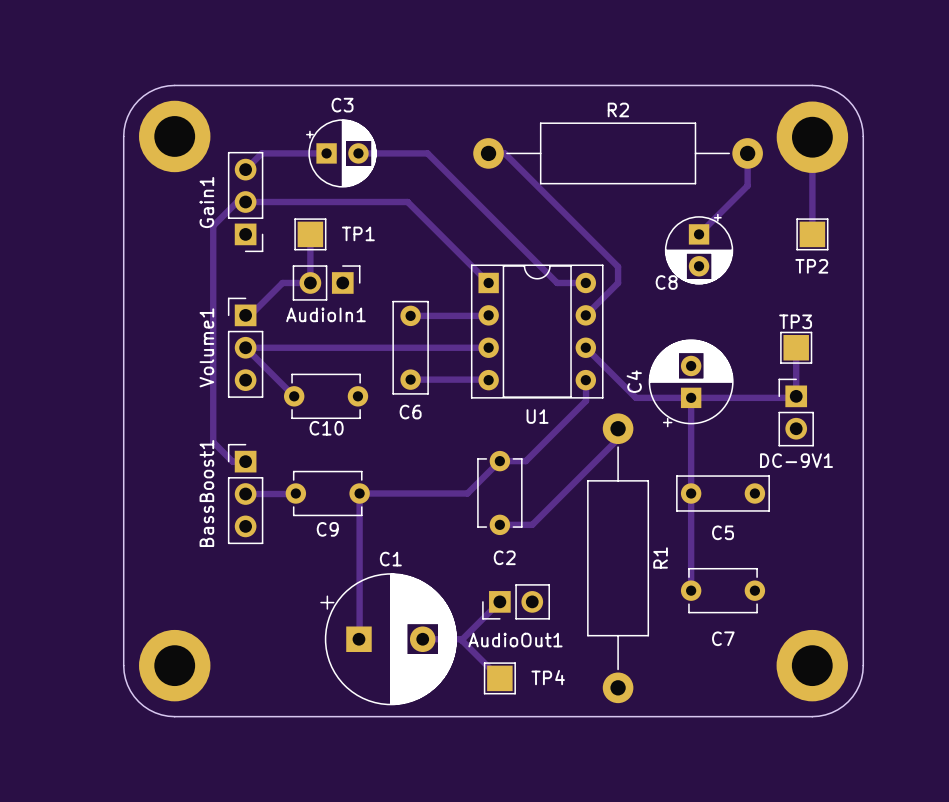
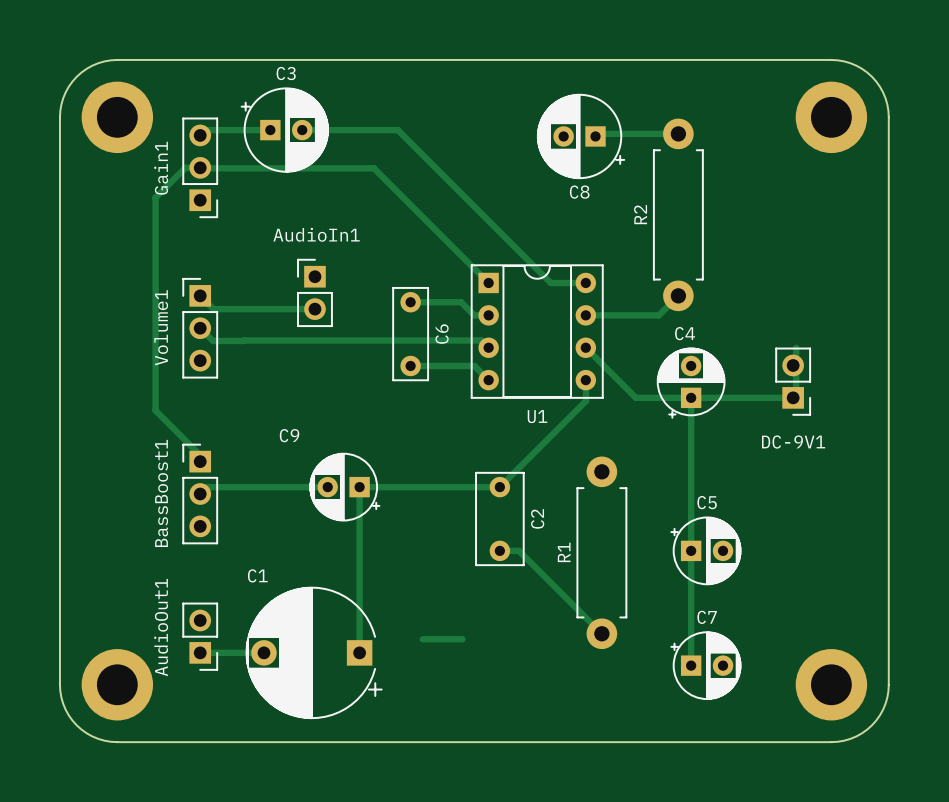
board edge: (174, 85) (812, 85) (831, 89) (848, 100) (859, 116) (863, 136) (863, 665) (859, 685) (848, 701) (831, 712) (812, 716) (174, 716) (155, 712) (138, 701) (127, 685) (123, 665) (123, 136) (127, 116) (138, 100) (155, 89) (174, 85) -> (117, 59) (92, 65) (76, 76) (63, 98) (59, 117) (59, 684) (65, 709) (81, 729) (98, 738) (117, 742) (831, 742) (856, 736) (876, 720) (885, 703) (888, 684) (888, 117) (883, 92) (867, 72) (850, 63) (831, 59) (117, 59)
R2 name position: R2 (618, 109) -> R2 (640, 214)
C3 footprint: [305, 119, 377, 188] -> [240, 87, 329, 173]
R2 footprint: [473, 122, 763, 185] -> [653, 118, 704, 312]
track: none -> (270, 130) (205, 130) (200, 135)
track: none -> (678, 133) (598, 133) (595, 136)
part position: (174, 136) -> (117, 117)
track: (812, 137) (812, 234) -> none
part position: (812, 137) -> (831, 117)
track: (326, 153) (261, 153) (245, 169) -> none
track: (358, 153) (427, 153) (557, 282) -> (302, 130) (397, 130) (550, 282) (557, 282)
track: (488, 153) (504, 153) (618, 266) (618, 283) (585, 315) -> (678, 295) (658, 315) (585, 315)
track: (747, 153) (747, 185) (699, 234) -> none
Gain1 position: (245, 202) -> (200, 167)
track: (407, 202) (237, 202) (213, 225) (213, 442) (232, 461) (245, 461) -> (407, 202) (374, 168) (185, 167) (155, 197) (155, 410) (200, 455) (200, 461)
C8 footprint: [664, 213, 734, 285] -> [537, 94, 625, 179]
track: (310, 234) (310, 282) (282, 282) (250, 315) (245, 315) -> none
TP1: (310, 234) -> none
TP2: (812, 234) -> none
AudioIn1 rotation: 0° (326, 282) -> 90° counterclockwise (314, 292)
C8 name position: C8 (666, 282) -> C8 (579, 192)
track: none -> (200, 295) (213, 309) (314, 309)
AudioIn1 name position: AudioIn1 (325, 314) -> AudioIn1 (316, 234)
track: (488, 315) (410, 315) -> (488, 315) (474, 315) (461, 302) (410, 302)
C4 footprint: [648, 339, 734, 428] -> [656, 347, 726, 419]
Volume1 position: (245, 347) -> (200, 328)
C6 position: (410, 347) -> (410, 334)
track: (488, 347) (245, 347) (294, 396) -> (488, 347) (481, 340) (212, 340) (200, 328)
TP3: (796, 347) -> none
track: (410, 379) (488, 379) -> (410, 365) (474, 365) (488, 379)
C4 name rotation: 0° (634, 381) -> 90° clockwise (685, 333)
C4 name position: C4 (634, 381) -> C4 (685, 333)
C10: (326, 396) -> none
C6 name rotation: 0° (410, 412) -> 90° counterclockwise (442, 334)
C6 name position: C6 (410, 412) -> C6 (442, 334)
DC-9V1 rotation: 0° (796, 412) -> 180° (793, 381)
R1 footprint: [587, 413, 650, 704] -> [576, 456, 628, 650]
track: (618, 428) (618, 439) (532, 524) (499, 524) -> none
C2 footprint: [477, 450, 523, 536] -> [475, 472, 525, 566]
track: (525, 461) (499, 461) (467, 493) (359, 493) -> (525, 461) (499, 487) (359, 487) (359, 493)
C9 footprint: [285, 470, 370, 517] -> [309, 452, 381, 522]
C5 footprint: [676, 475, 770, 512] -> [670, 516, 742, 586]
track: none -> (327, 487) (207, 487) (200, 494)
track: (295, 493) (245, 494) -> none
BassBoost1 position: (245, 494) -> (200, 494)
C9 name position: C9 (327, 529) -> C9 (289, 435)
C5 name position: C5 (723, 532) -> C5 (707, 502)
track: none -> (499, 550) (519, 550) (601, 633)
C2 name position: C2 (504, 557) -> C2 (537, 518)
R1 name position: R1 (660, 557) -> R1 (564, 552)
C1 name position: C1 (390, 559) -> C1 (257, 575)
C7 footprint: [680, 567, 766, 614] -> [670, 631, 742, 700]
C1 footprint: [320, 573, 457, 706] -> [245, 586, 383, 719]
track: none -> (691, 590) (691, 665)
track: (499, 601) (462, 639) (499, 678) -> none
AudioOut1 rotation: 0° (516, 601) -> 90° counterclockwise (200, 636)
AudioOut1 position: (516, 601) -> (200, 636)
C7 name position: C7 (723, 638) -> C7 (707, 617)
AudioOut1 name position: AudioOut1 (515, 640) -> AudioOut1 (161, 627)
track: none -> (200, 652) (263, 652)
part position: (174, 665) -> (117, 684)
part position: (812, 665) -> (831, 684)
TP4: (499, 678) -> none

